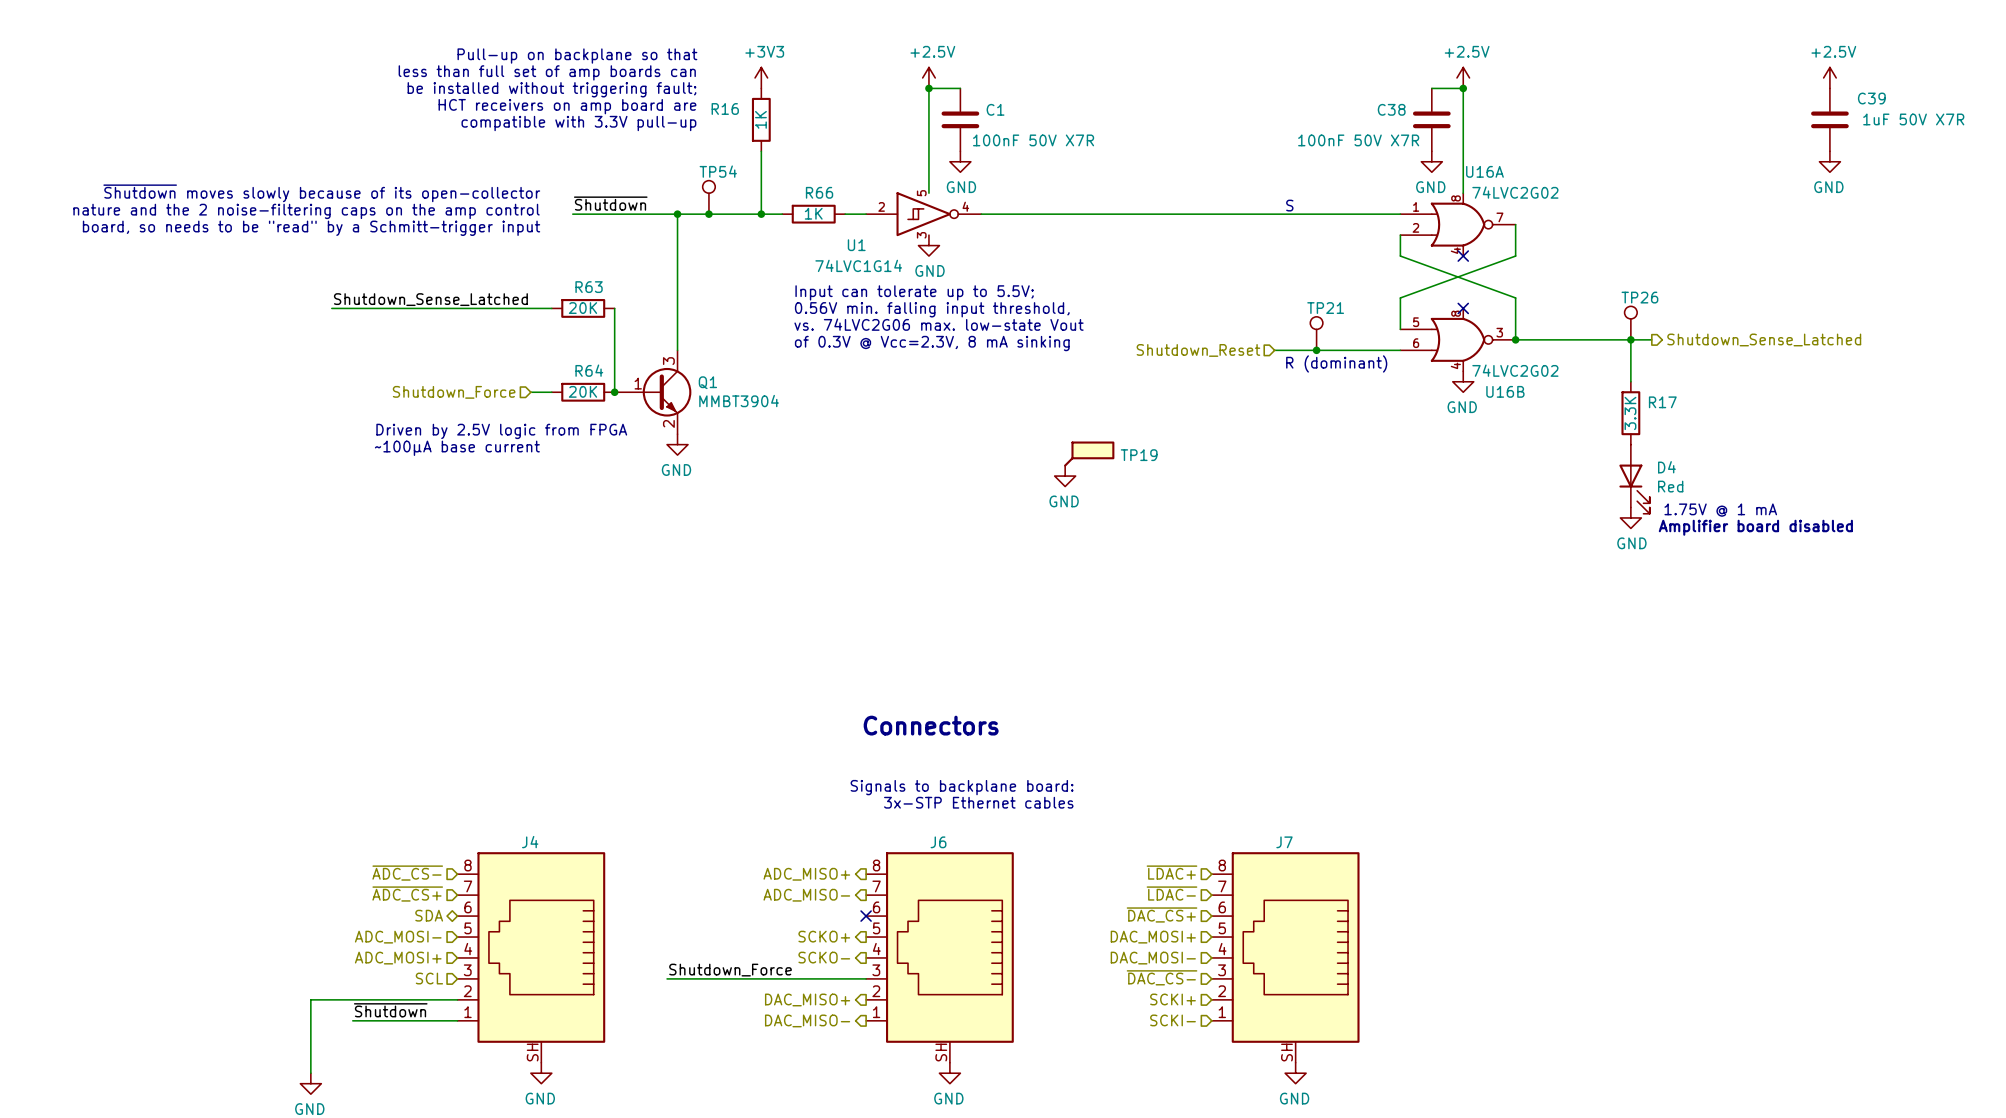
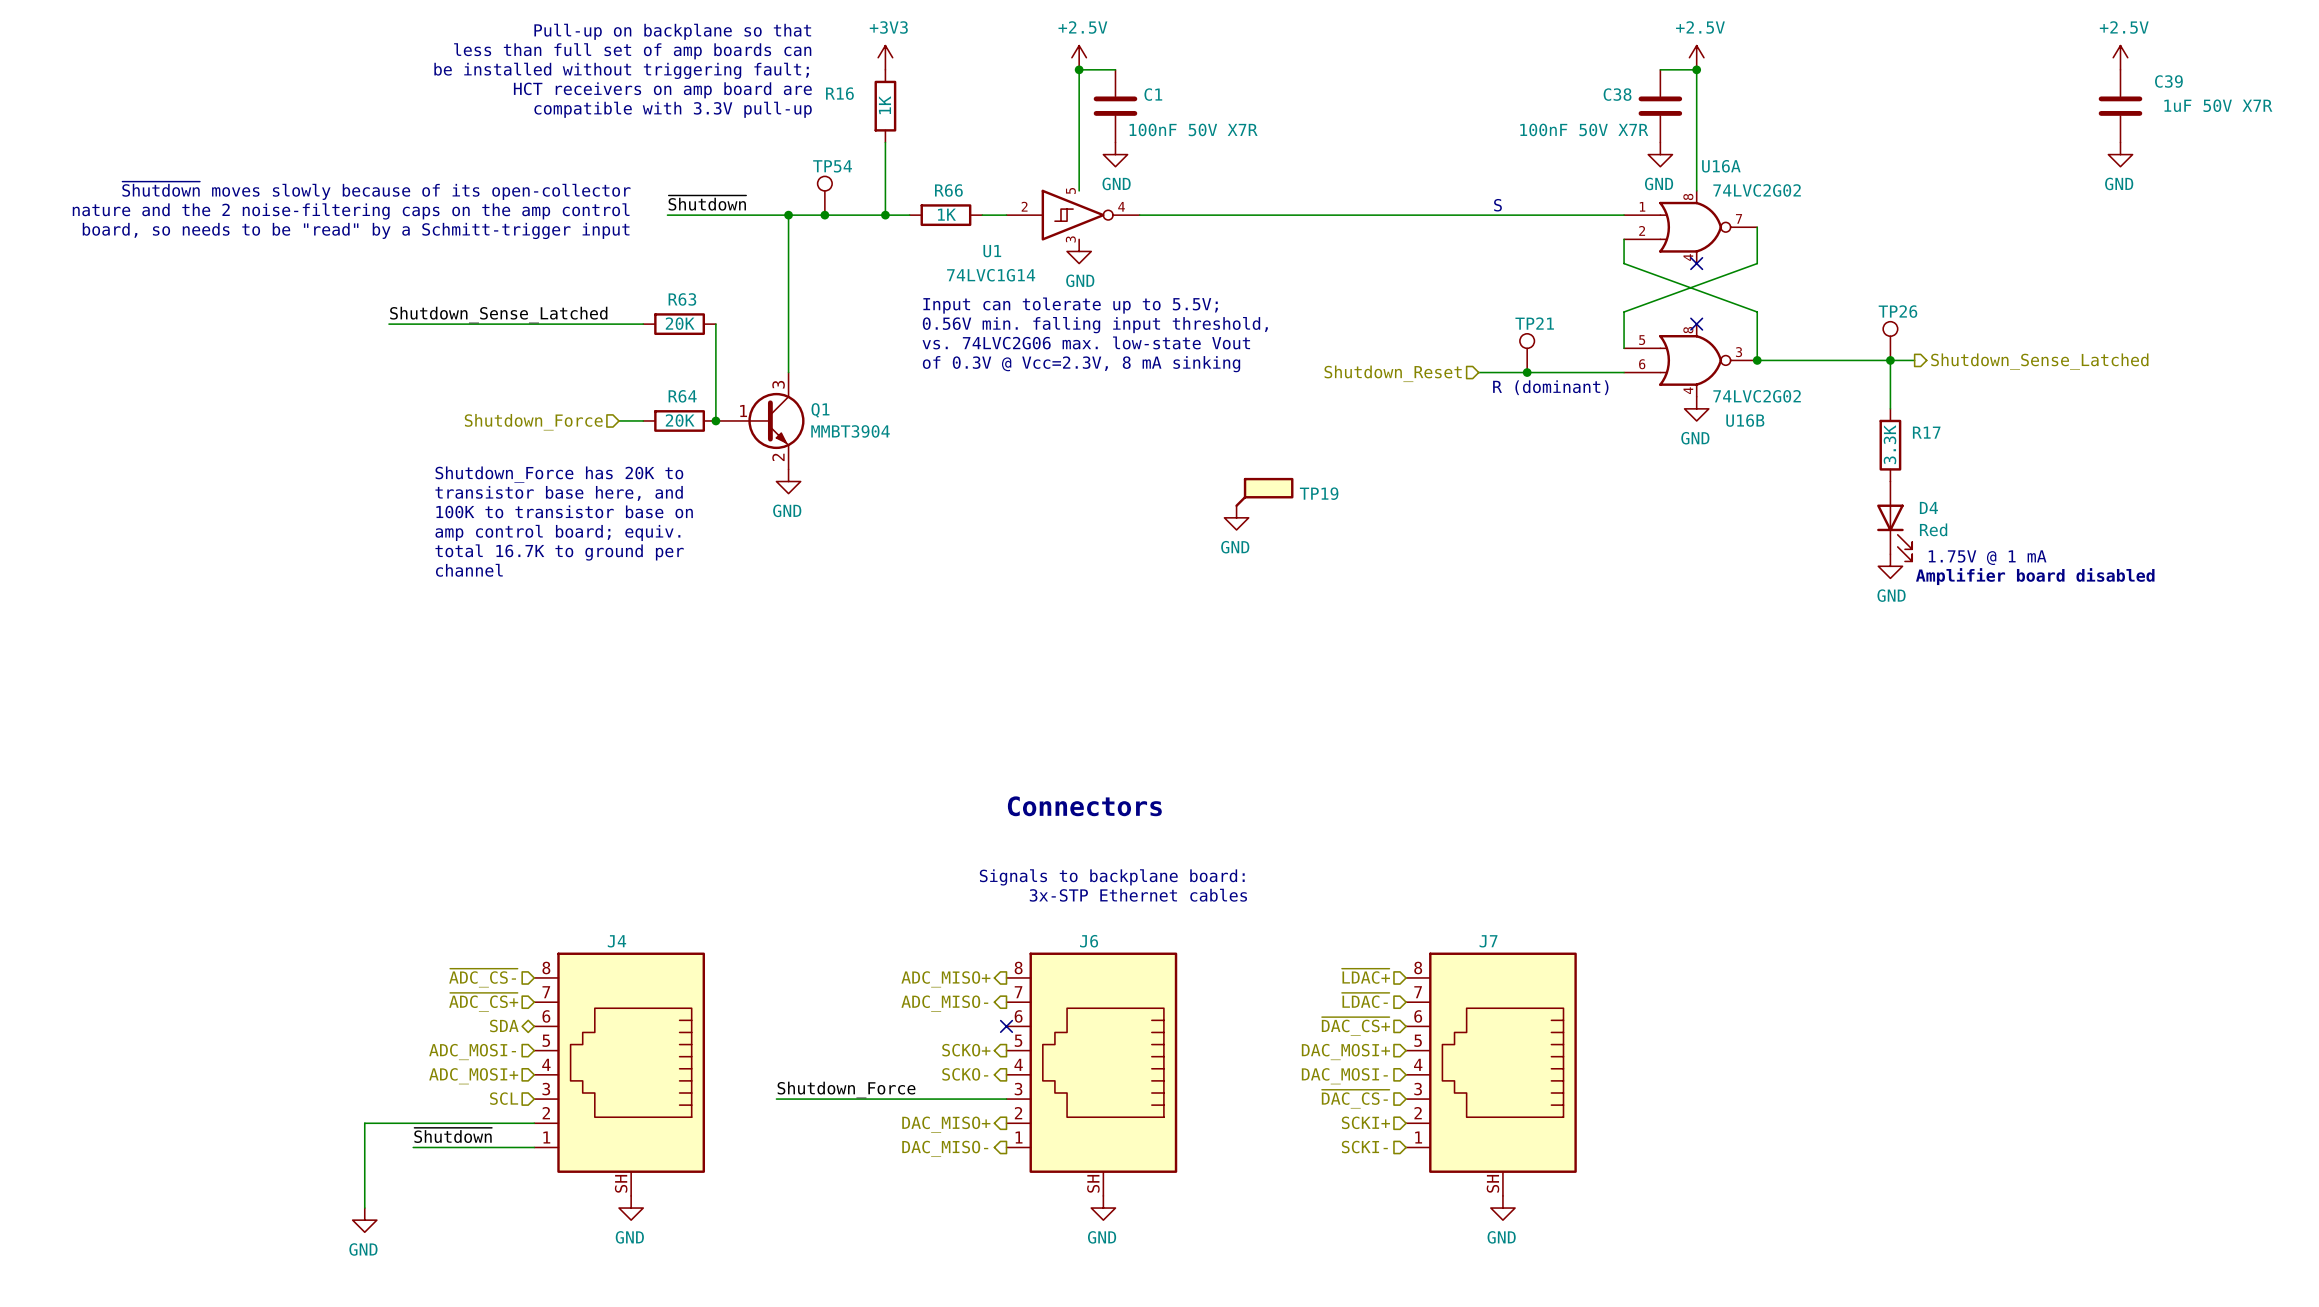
text: Driven by 2.5V logic from FPGA (501, 431) -> Shutdown_Force has 20K to (559, 474)
text: ~100µA base current (457, 448) -> transistor base here, and (559, 493)
text: none -> 100K to transistor base on (564, 511)
text: none -> amp control board; equiv. (557, 532)
text: none -> total 16.7K to ground per (559, 552)
text: none -> channel (469, 570)

